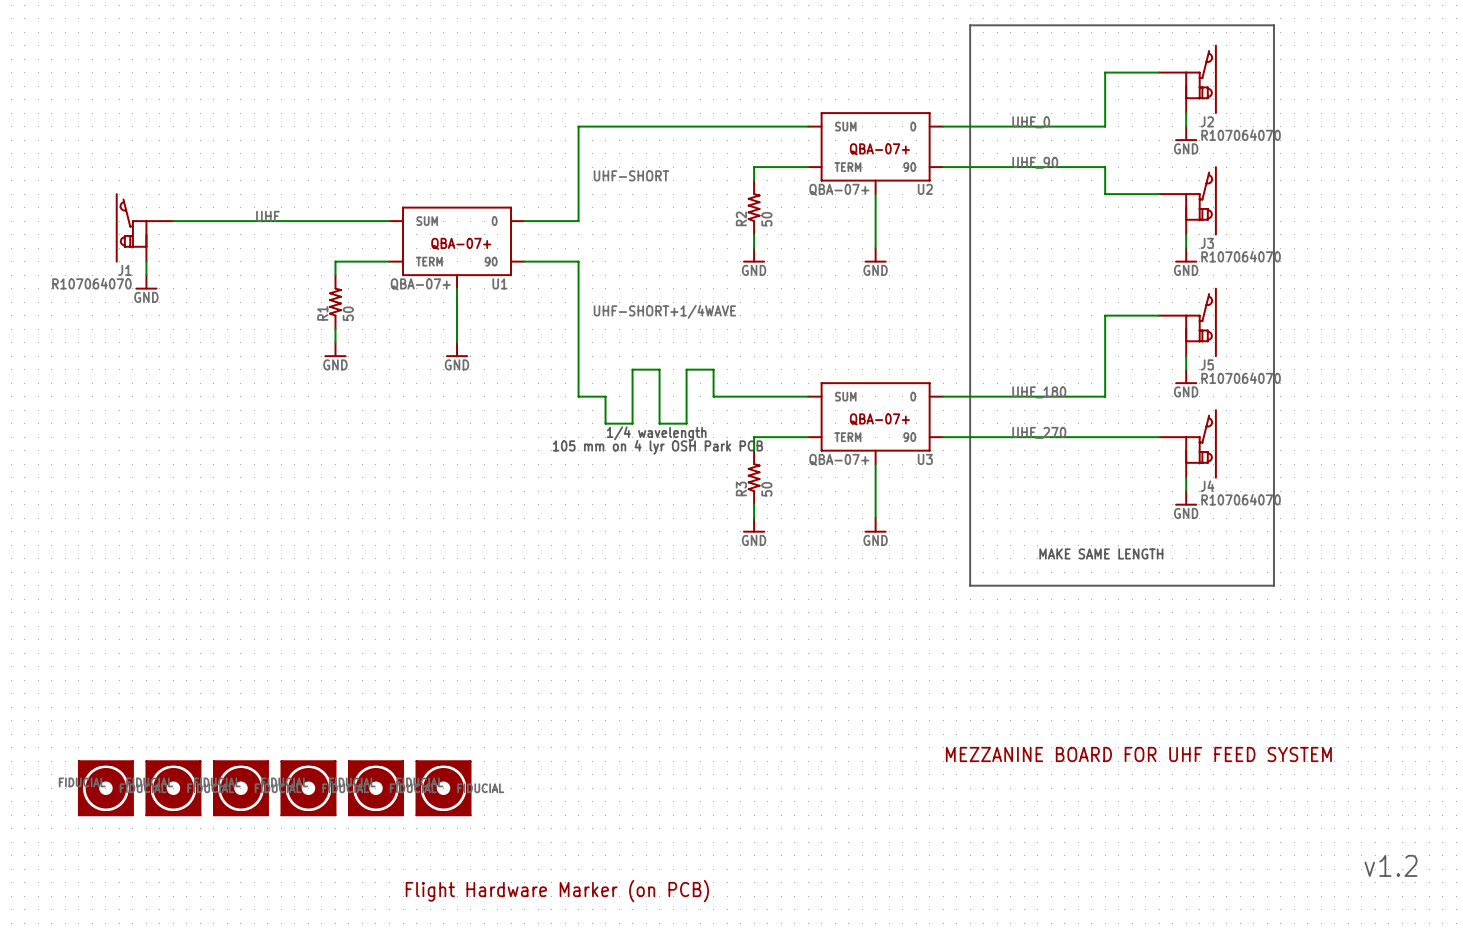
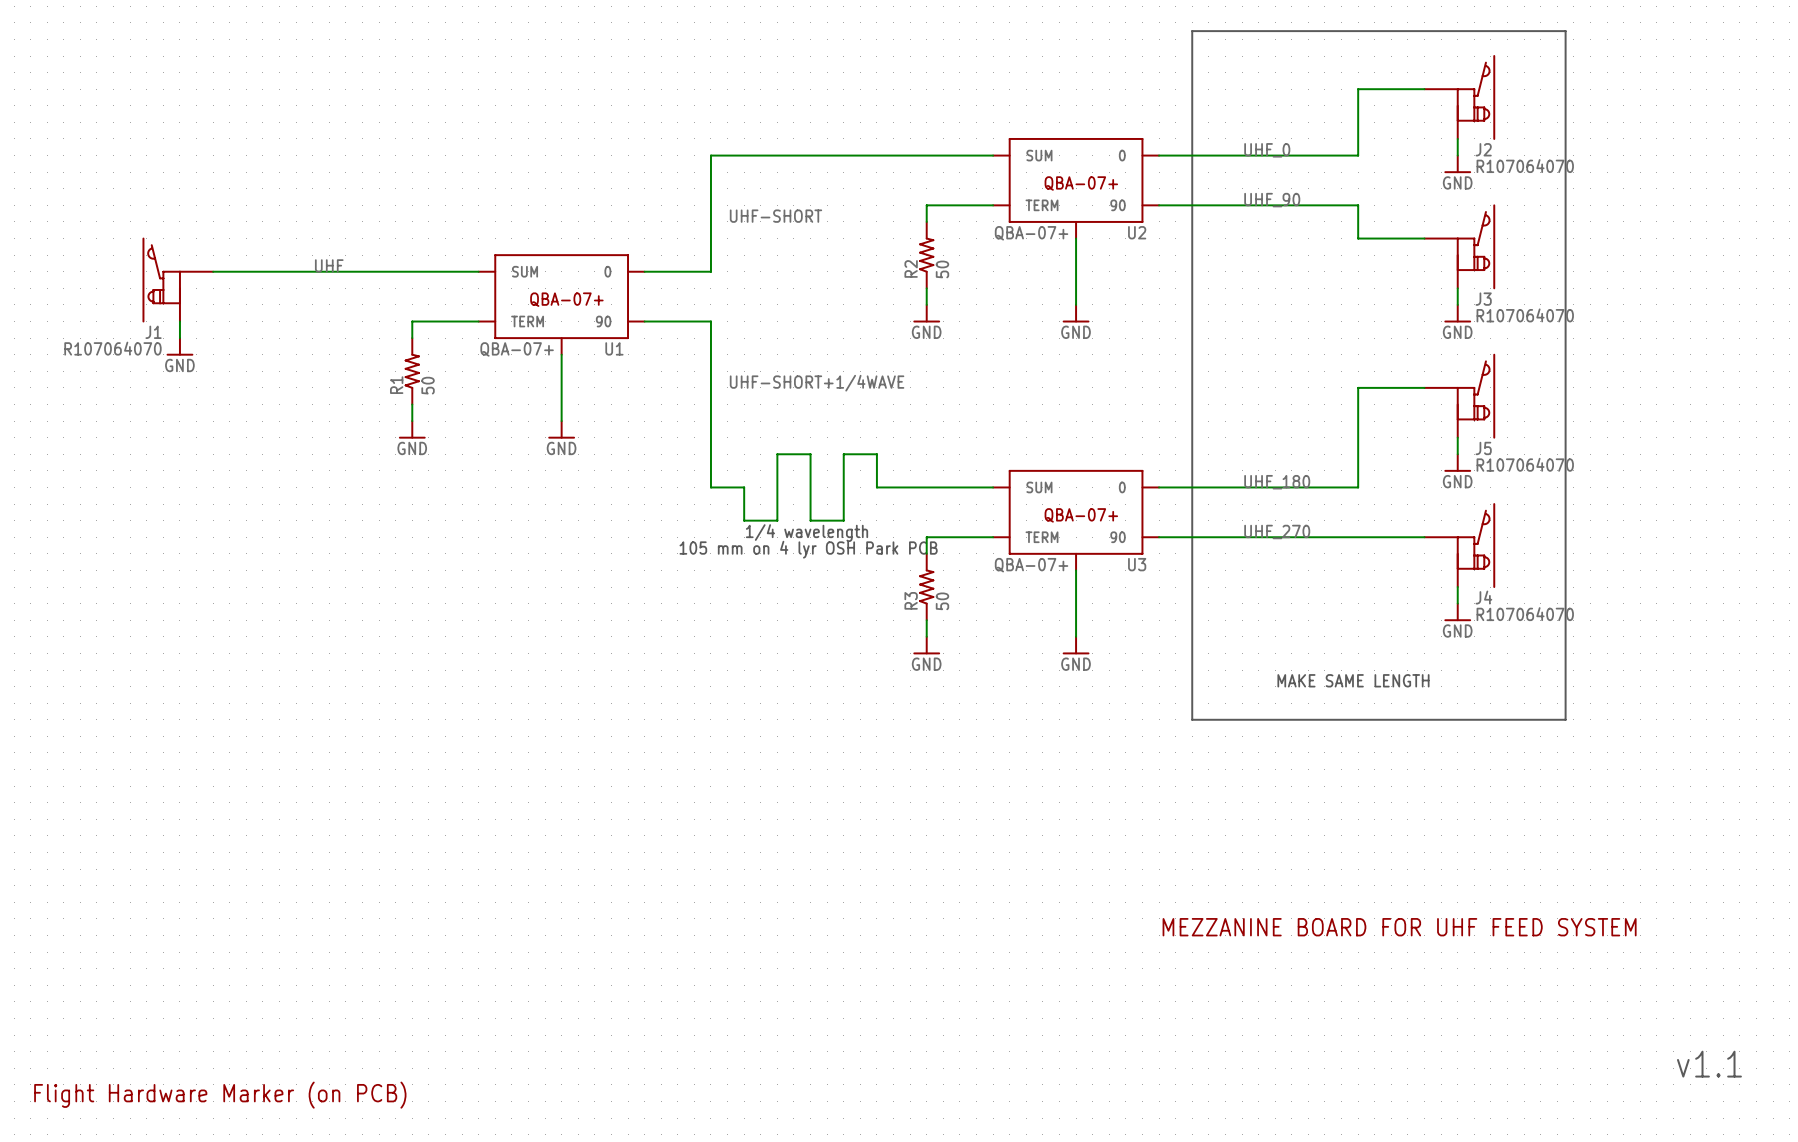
part: (105, 788) -> none
part: (173, 788) -> none
part: (240, 788) -> none
part: (308, 788) -> none
part: (375, 788) -> none
part: (443, 788) -> none
text: v1.2 (1391, 865) -> v1.1 (1709, 1064)
part: none -> (220, 1095)
part: (557, 891) -> none

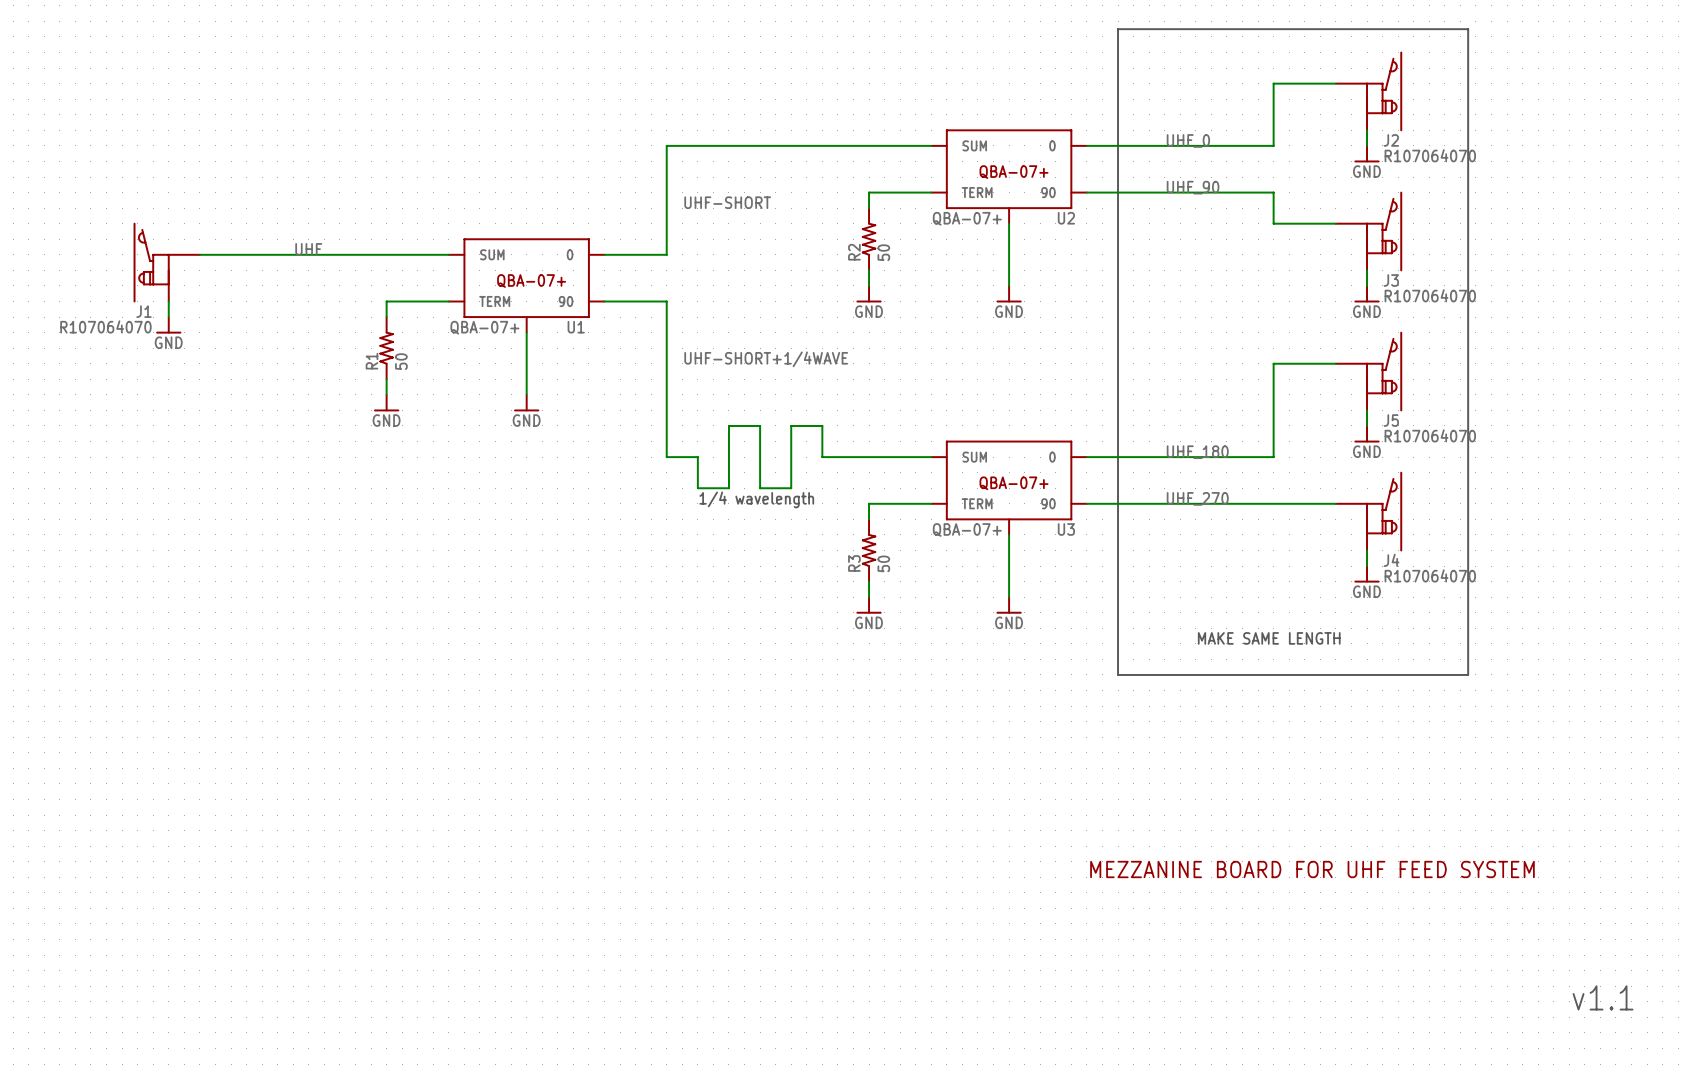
text: 105 mm on 4 lyr OSH Park PCB (808, 549) -> none
part: (220, 1095) -> none

